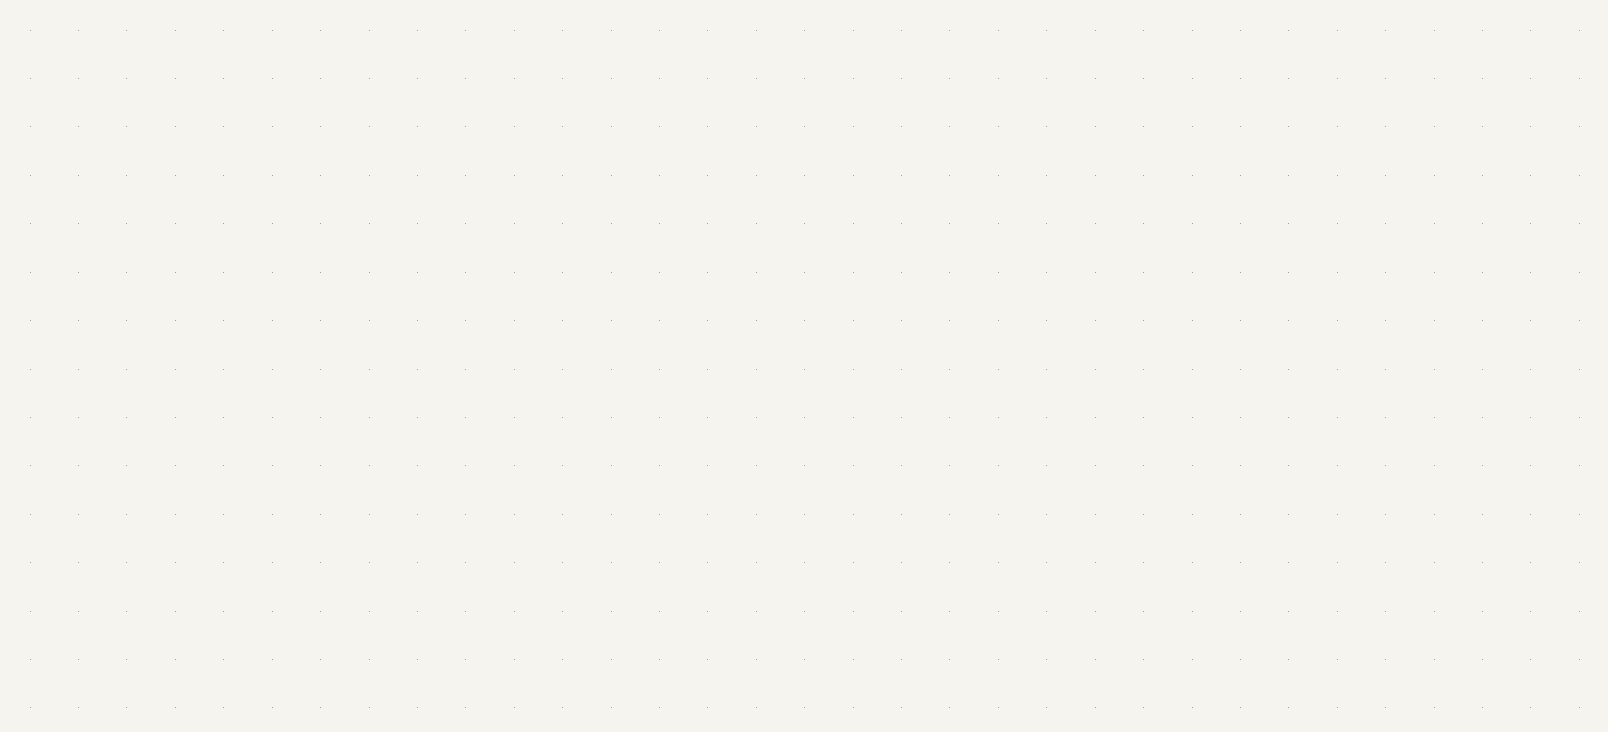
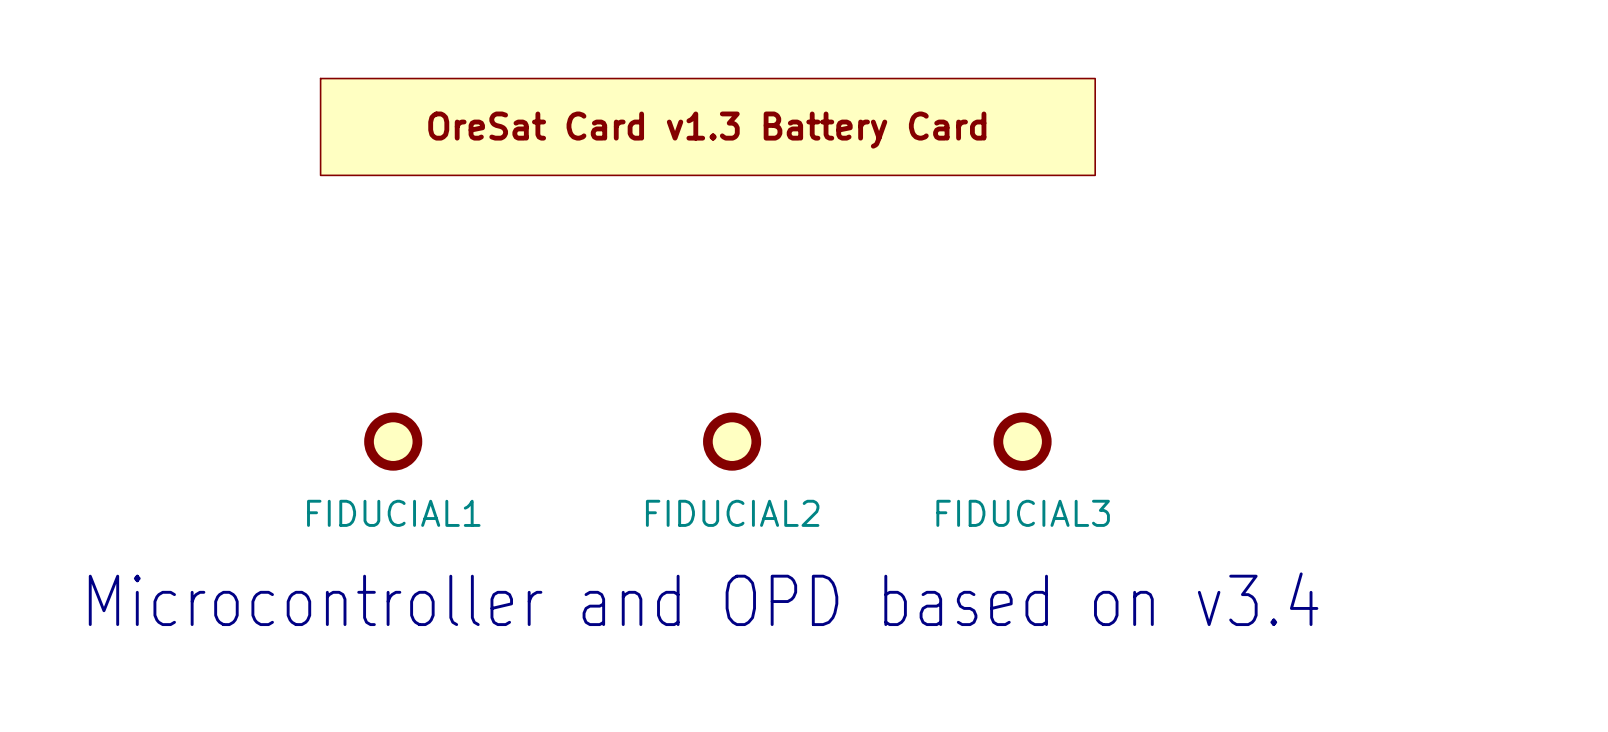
part: none -> (707, 126)
FIDUCIAL1: none -> (393, 441)
FIDUCIAL2: none -> (732, 441)
FIDUCIAL3: none -> (1022, 441)
text: none -> Microcontroller and OPD based on v3.4 (703, 599)

